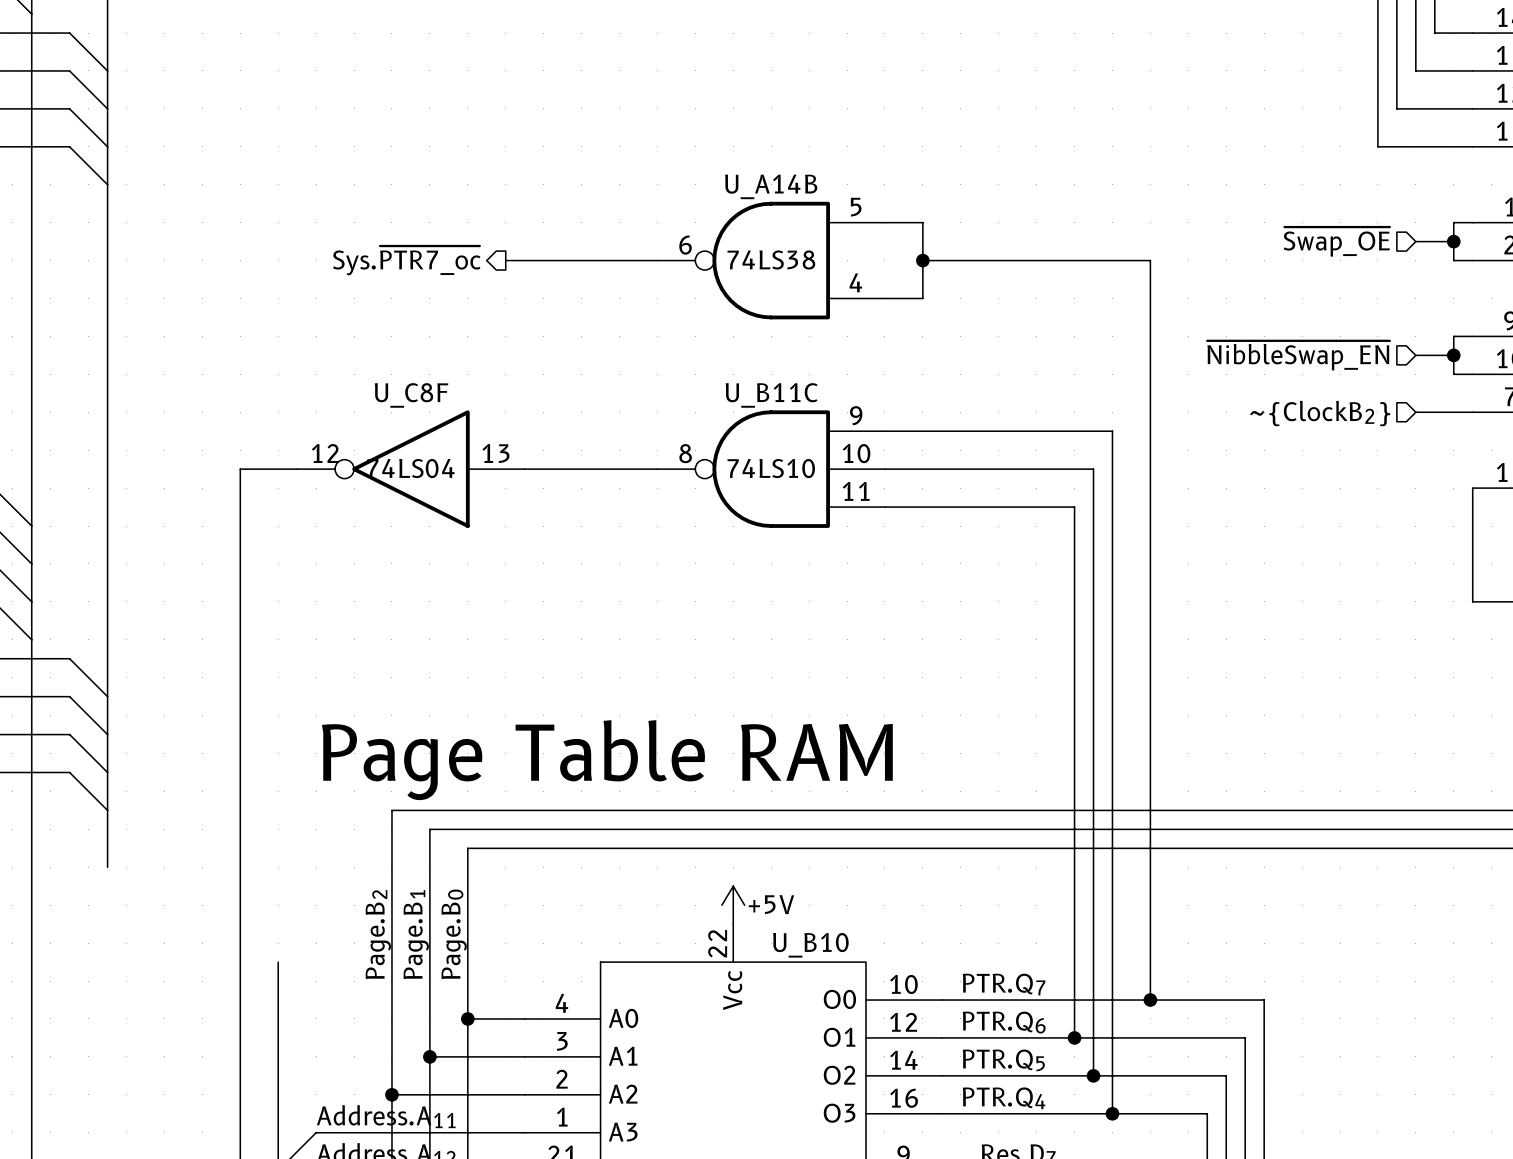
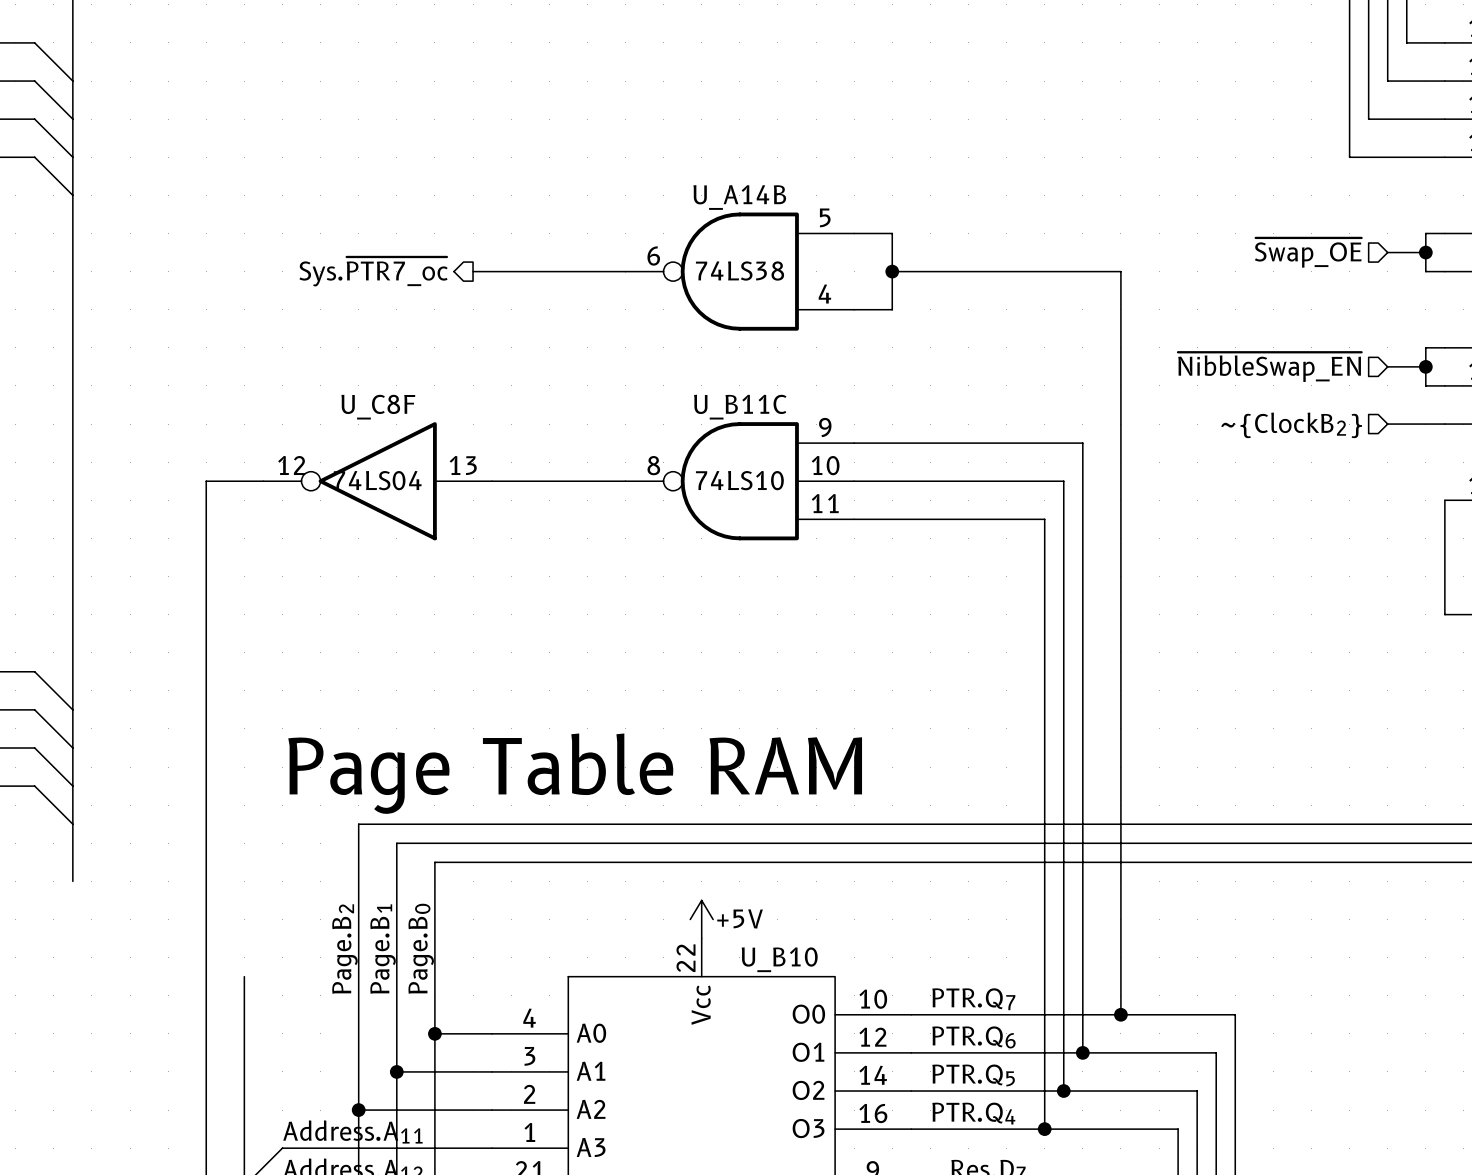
junction: (1074, 1037) -> none
wire: (1112, 1037) (1112, 1113) -> (1044, 1052) (1044, 1129)
junction: none -> (1082, 1052)
junction: none -> (1044, 1129)
junction: (1112, 1113) -> none

